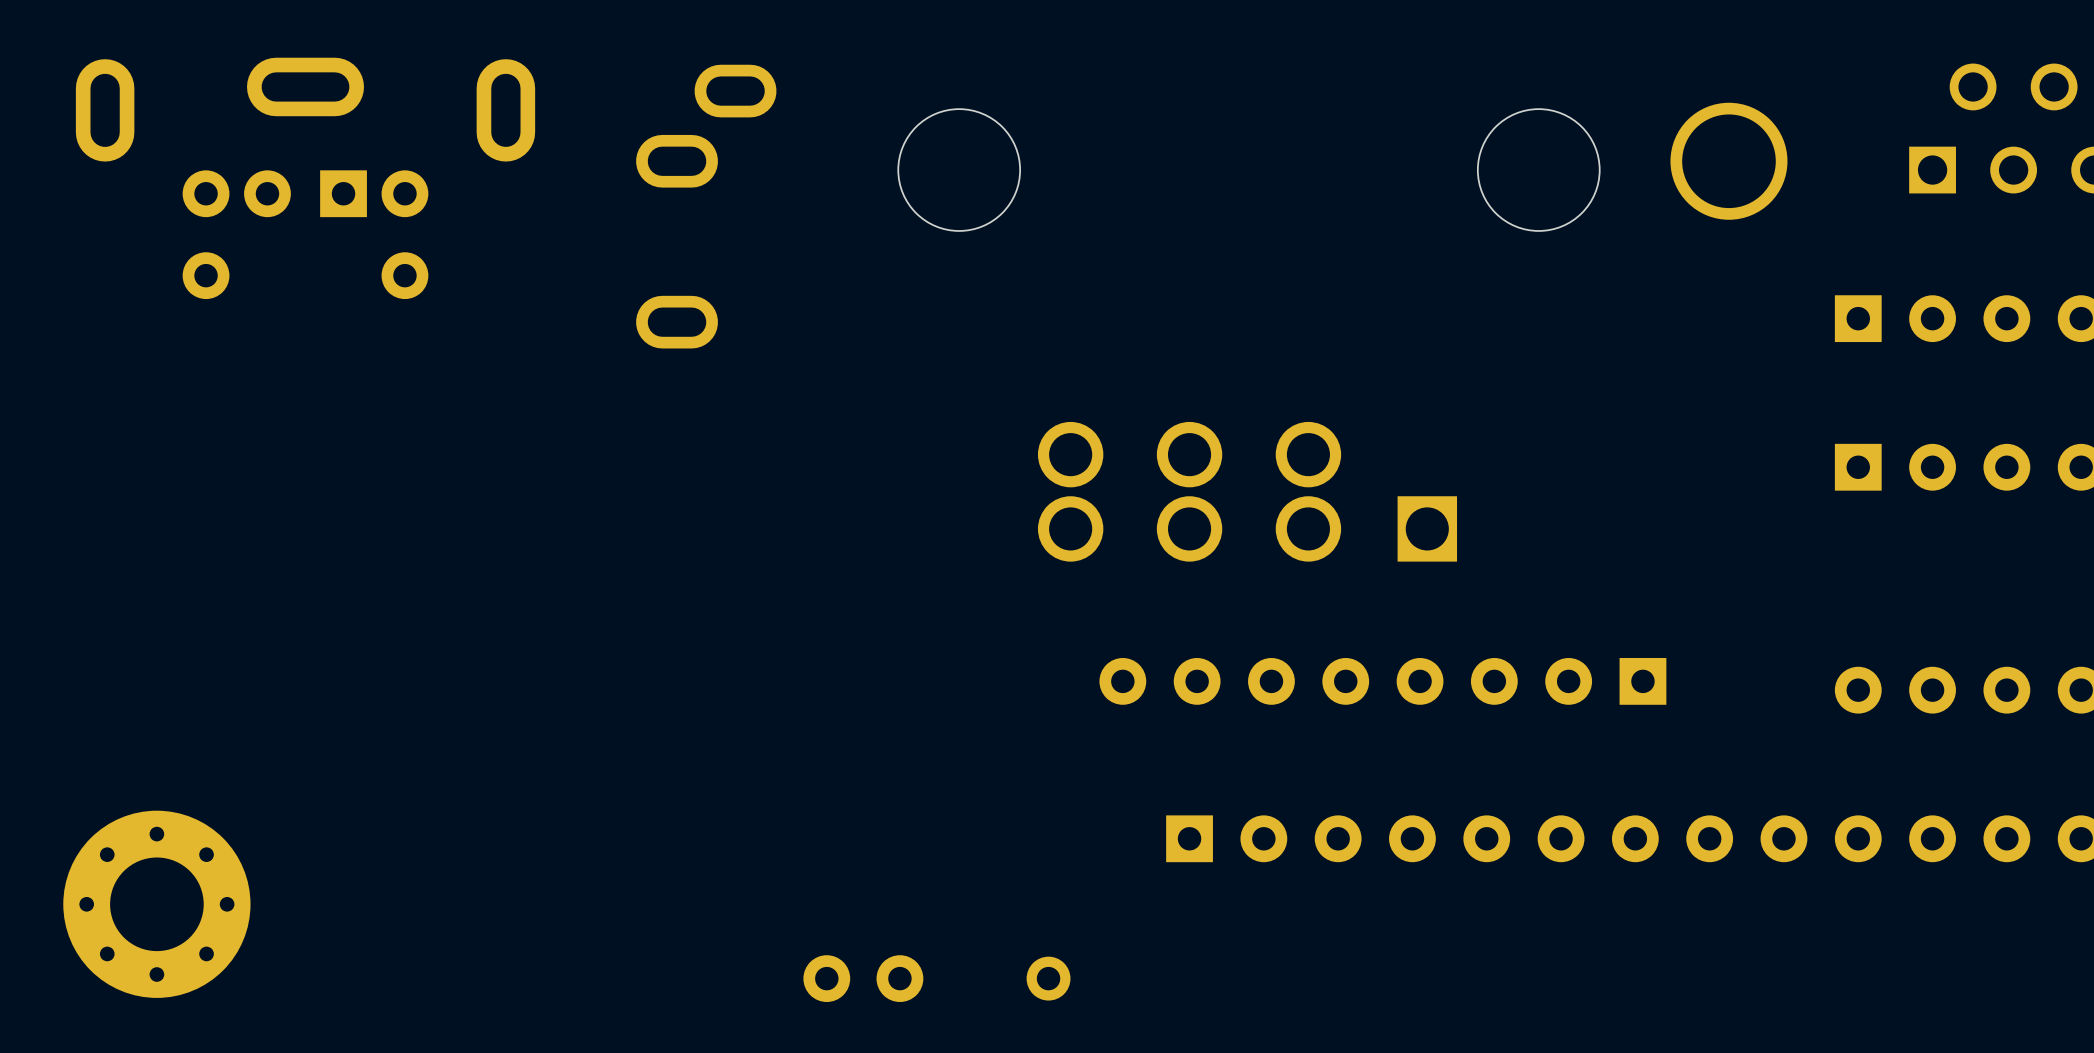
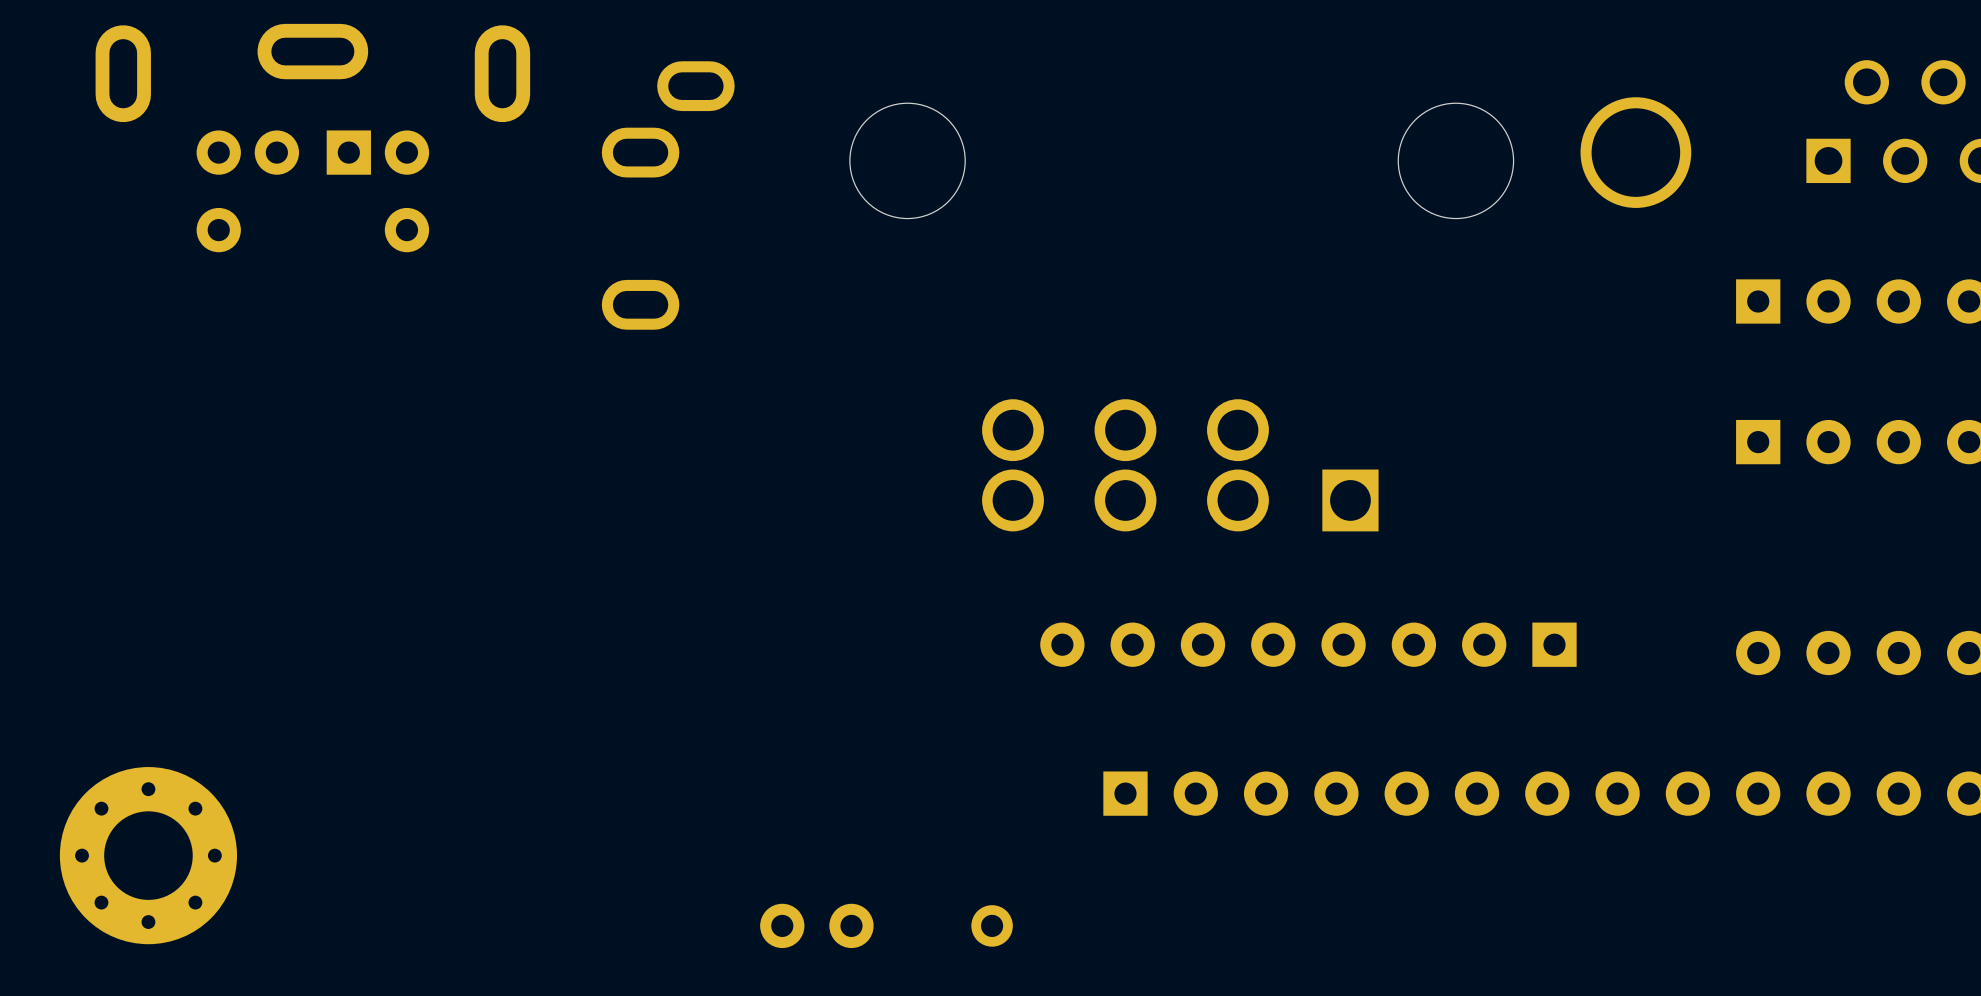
part position: (305, 178) -> (312, 138)

